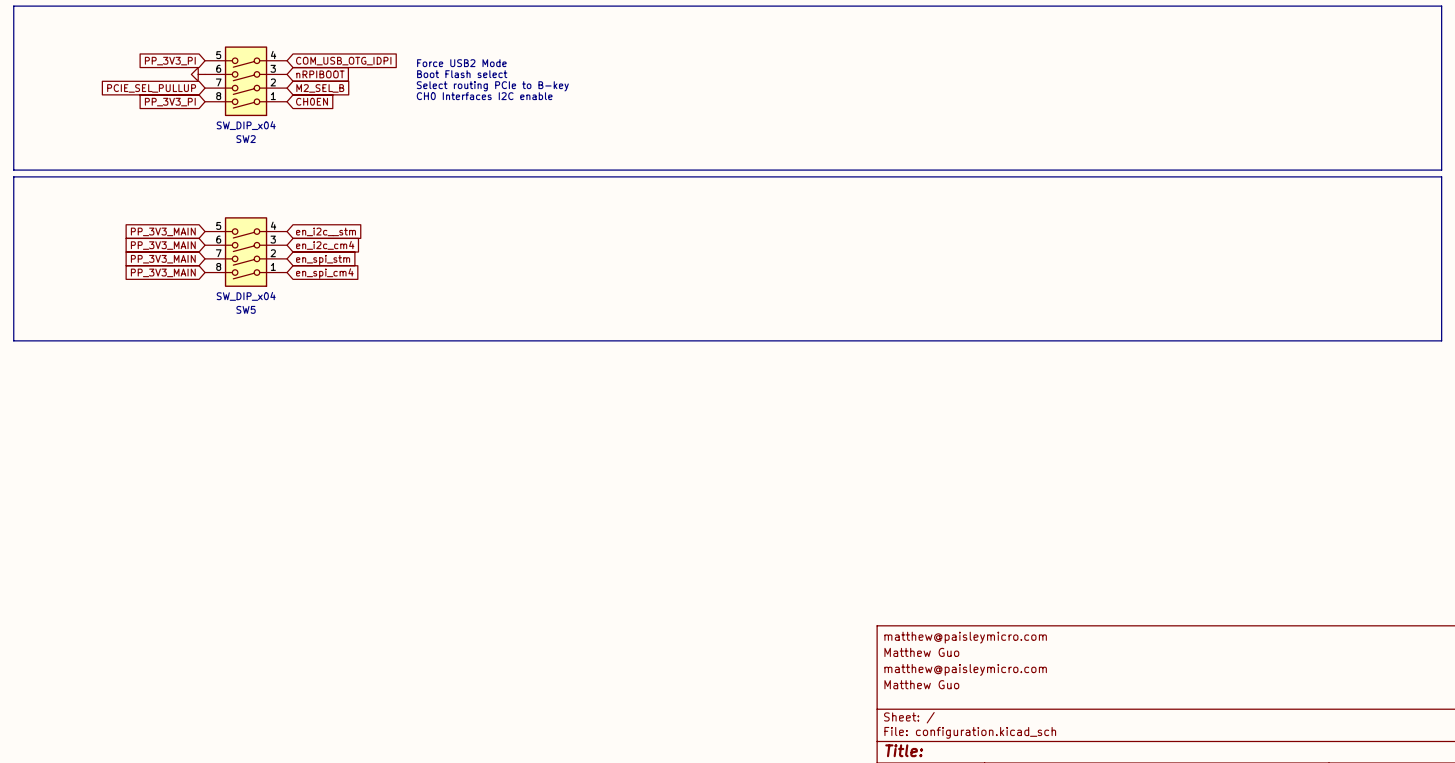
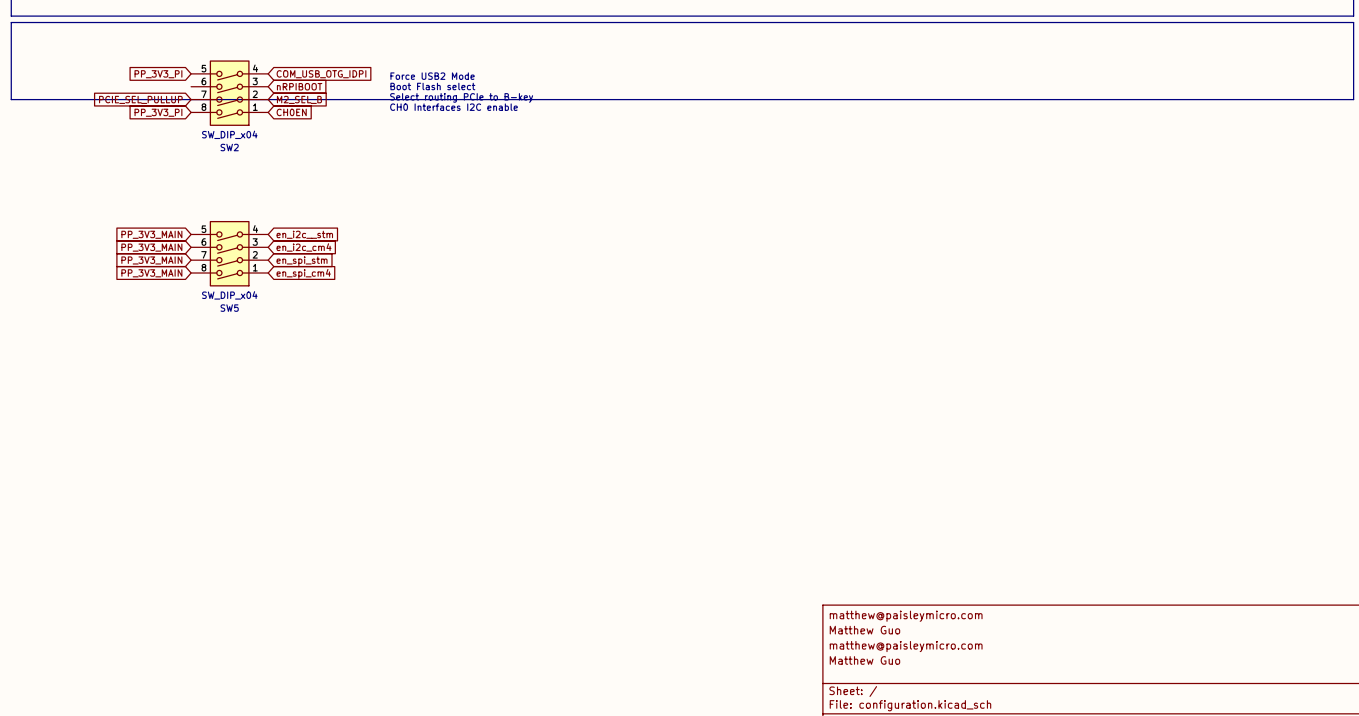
power symbol: (198, 74) -> none
line: (13, 88) (13, 170) (1441, 170) (1441, 88) -> (11, 99) (1353, 99)
line: (13, 176) (1441, 176) (1441, 340) (13, 340) (13, 176) -> none

